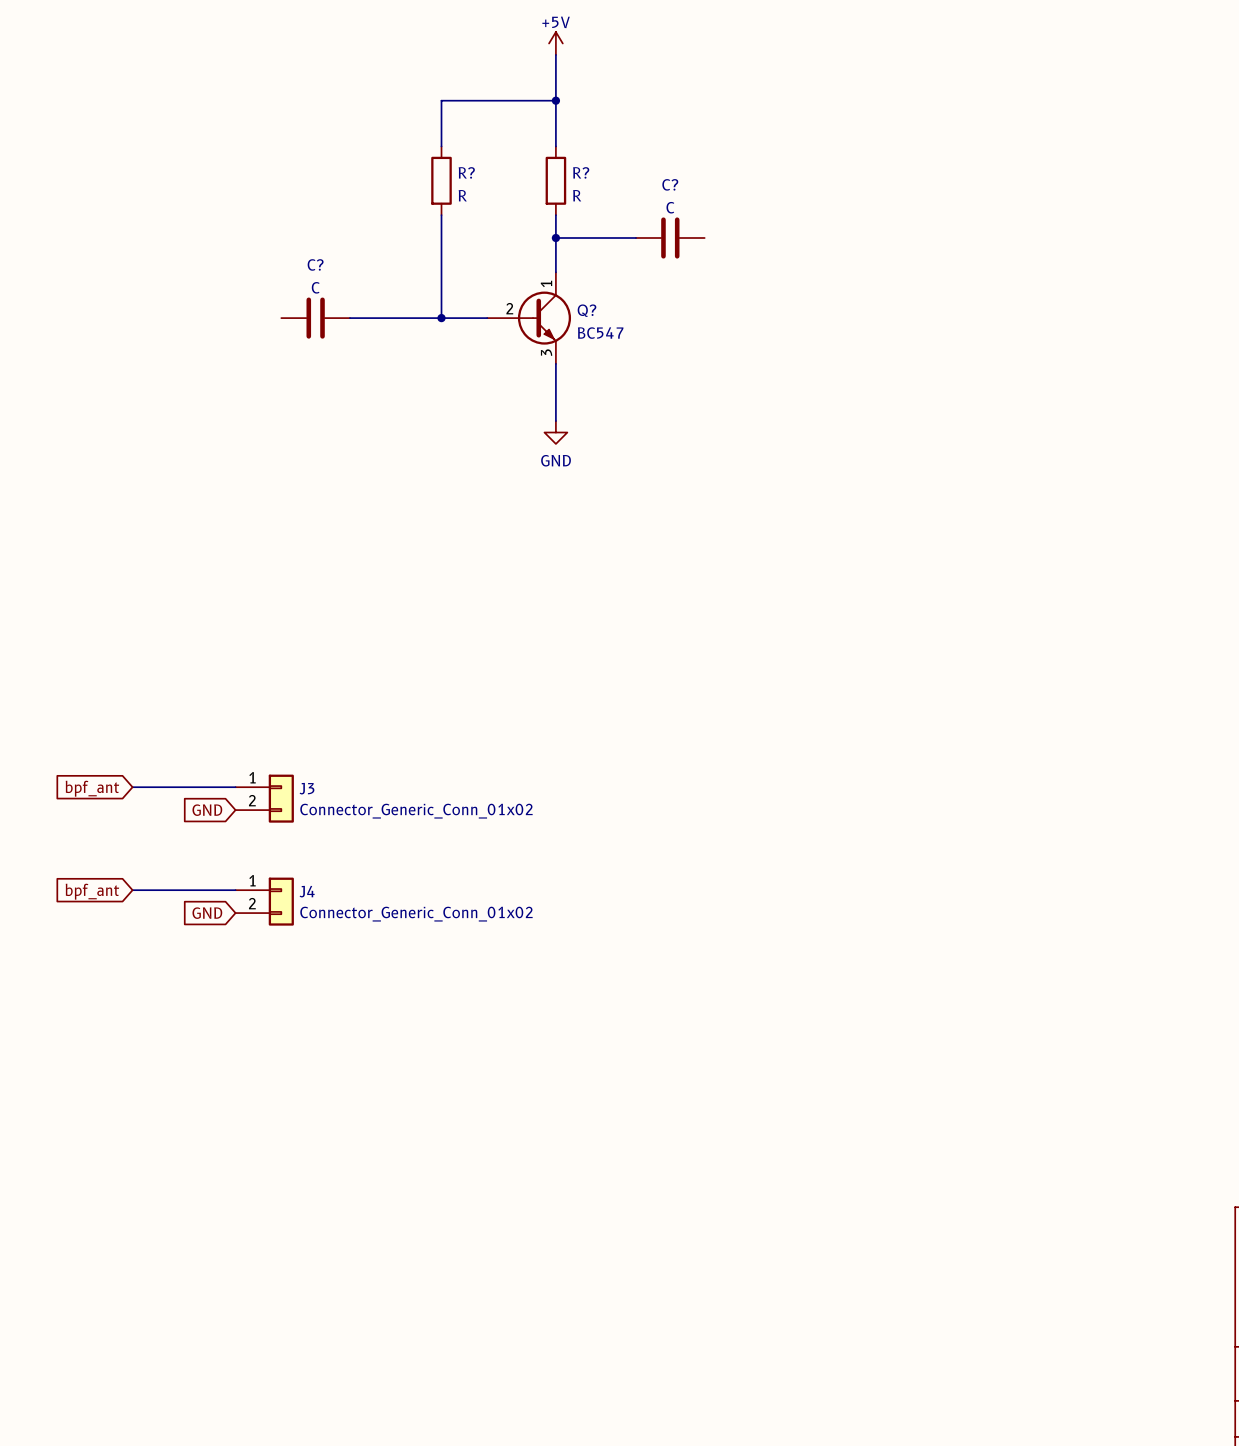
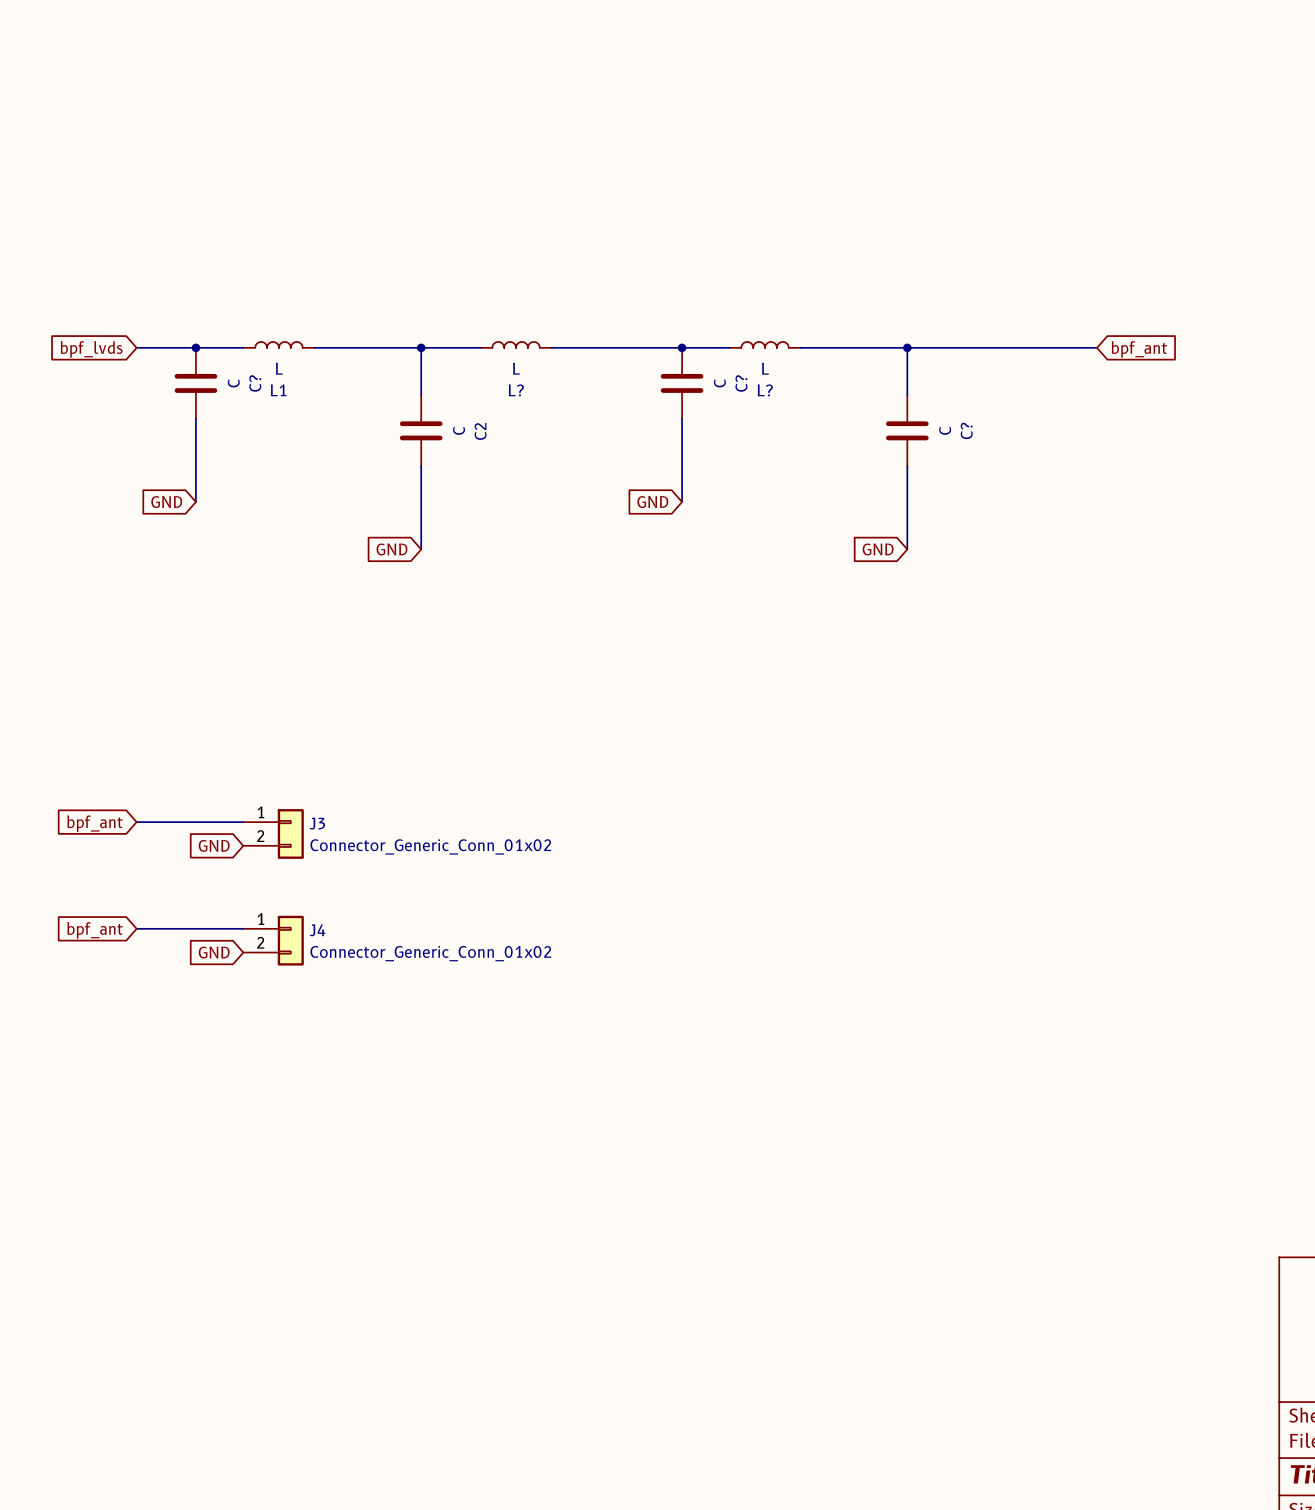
power symbol: +5V (555, 43) -> none
wire: (555, 54) (555, 146) -> none
wire: (555, 100) (441, 100) (441, 146) -> none
junction: (555, 100) -> none
R?: R (441, 180) -> none
R?: R (555, 180) -> none
wire: (441, 215) (441, 318) -> none
wire: (555, 215) (555, 272) -> none
wire: (555, 238) (636, 238) -> none
junction: (555, 238) -> none
C? rotation: 0° (670, 238) -> 90° clockwise (682, 383)
C? position: (670, 238) -> (682, 383)
C? rotation: 0° (315, 318) -> 90° clockwise (195, 383)
C? position: (315, 318) -> (195, 383)
wire: (349, 318) (487, 318) -> none
junction position: (441, 318) -> (421, 347)
Q?: BC547 (529, 318) -> none
L1: none -> L (278, 344)
L?: none -> L (516, 344)
L?: none -> L (765, 344)
wire: none -> (136, 347) (243, 347)
junction: none -> (195, 347)
wire: none -> (314, 347) (480, 347)
wire: none -> (421, 347) (421, 395)
wire: none -> (551, 347) (729, 347)
junction: none -> (682, 347)
wire: none -> (800, 347) (1097, 347)
wire: none -> (907, 347) (907, 395)
junction: none -> (907, 347)
global label: none -> bpf_lvds (91, 349)
global label: none -> bpf_ant (1139, 349)
wire: (555, 363) (555, 421) -> none
wire: none -> (195, 418) (195, 501)
wire: none -> (682, 418) (682, 501)
C2: none -> C (421, 430)
C?: none -> C (907, 430)
power symbol: GND (555, 432) -> none
wire: none -> (421, 466) (421, 549)
wire: none -> (907, 466) (907, 549)
global label: none -> GND (166, 502)
global label: none -> GND (652, 502)
global label: none -> GND (391, 549)
global label: none -> GND (878, 549)

